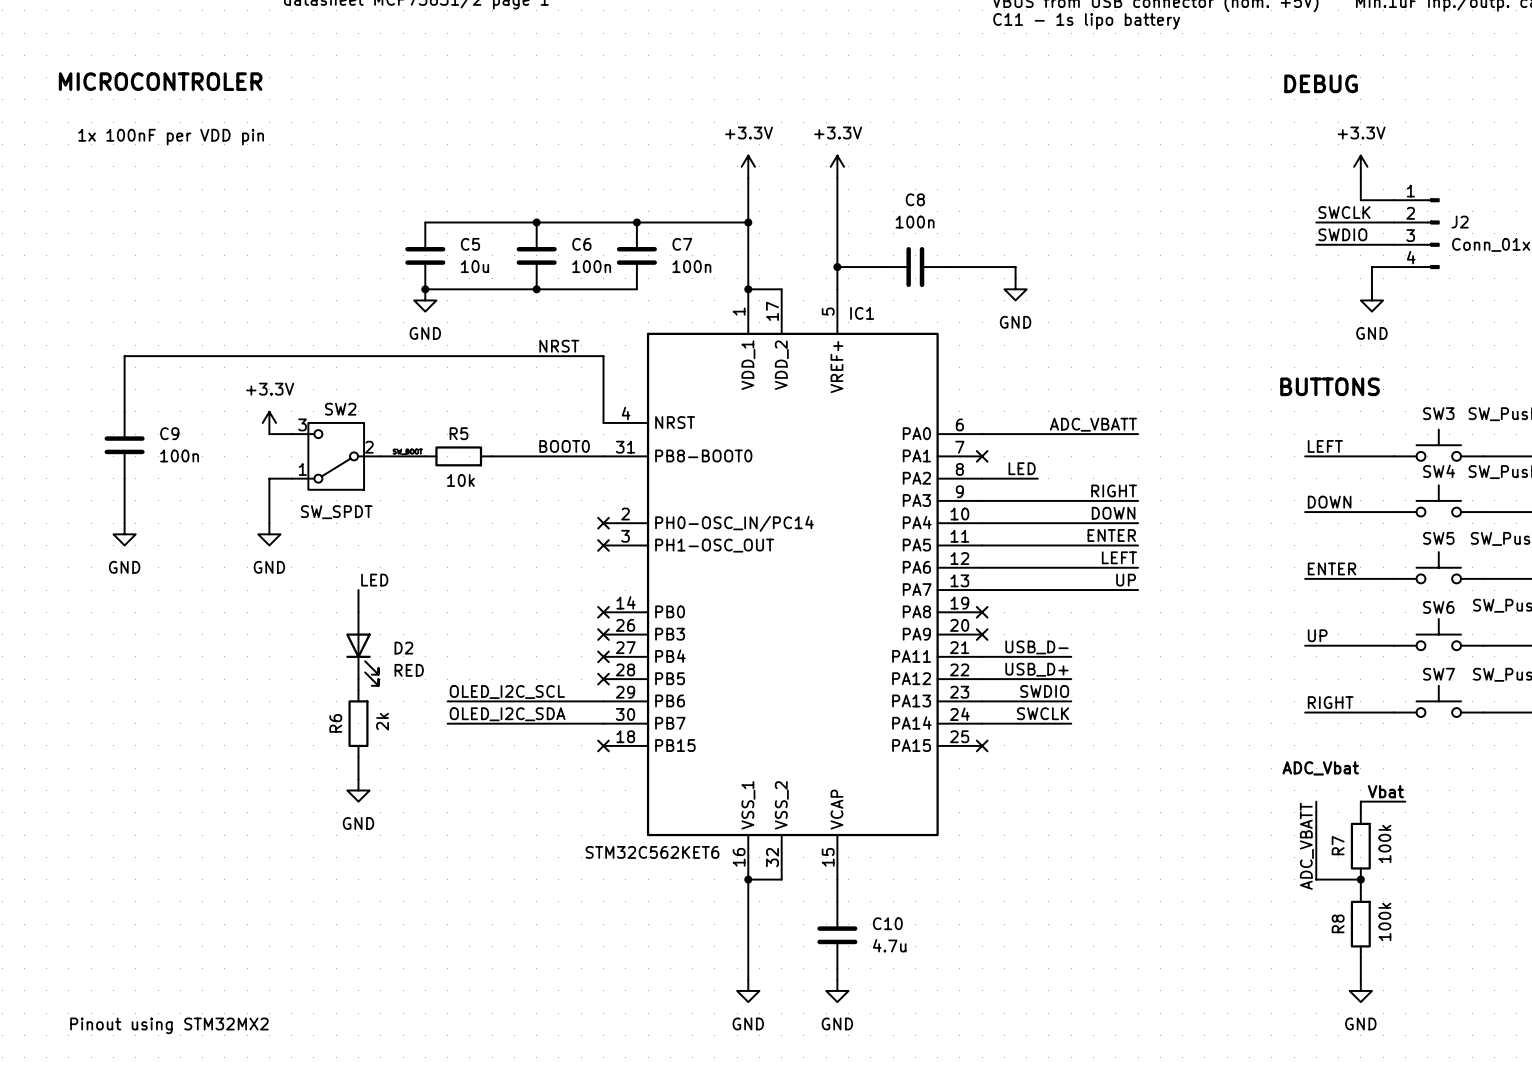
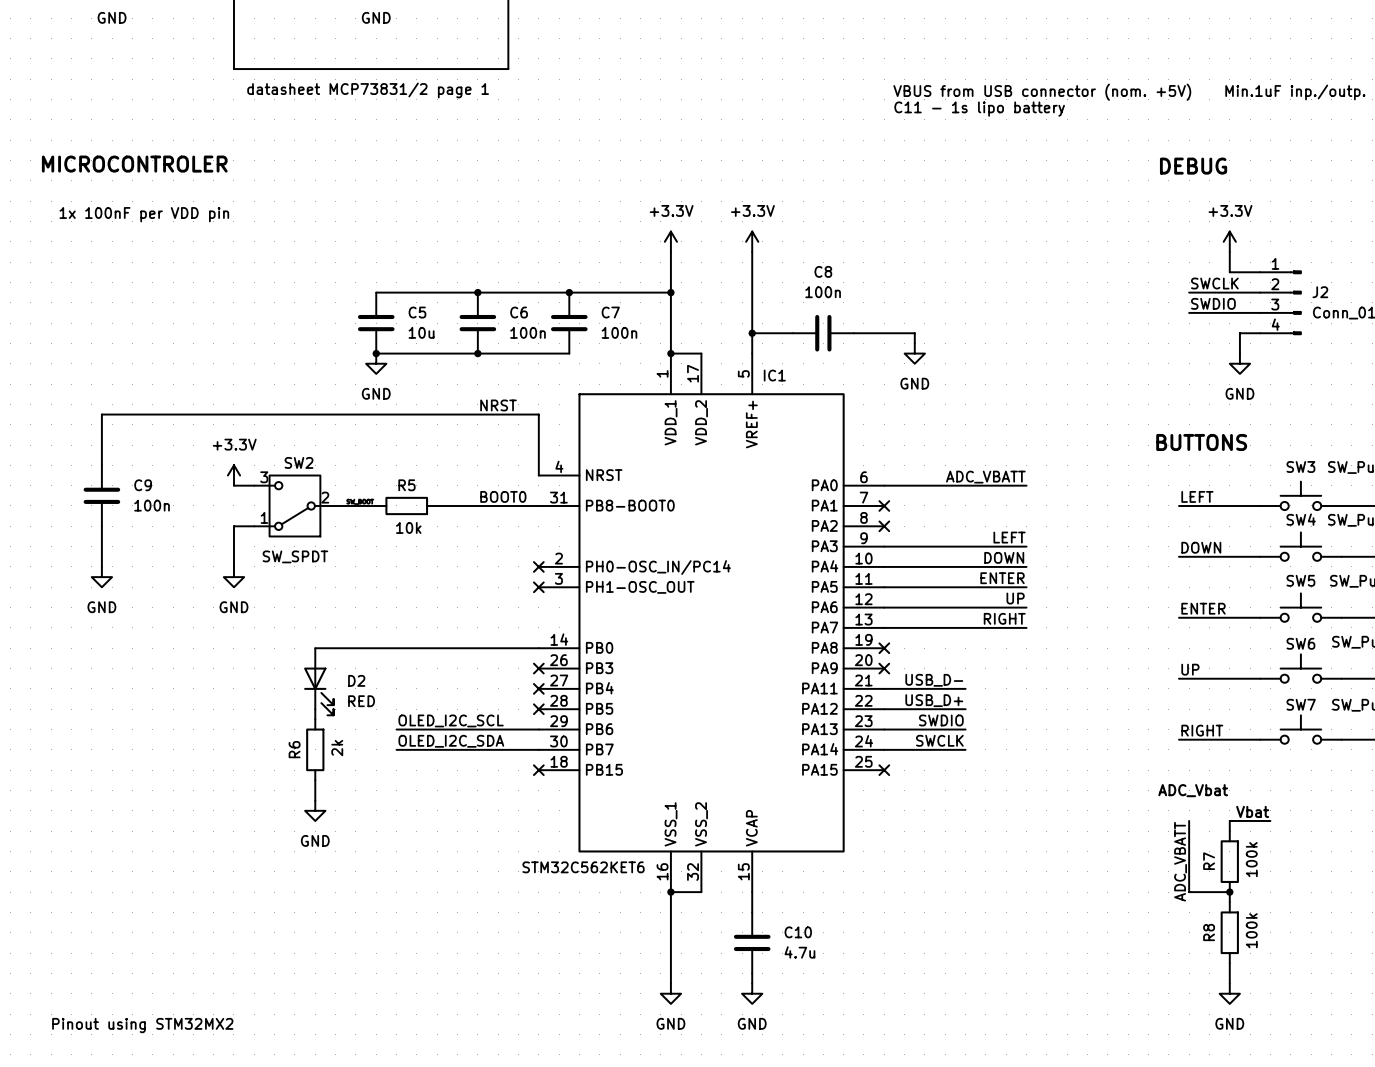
label: LED (1022, 468) -> none
wire: (982, 478) (1037, 478) -> none
no-connect mark: none -> (884, 526)
label: RIGHT (1114, 490) -> LEFT (1009, 537)
label: LEFT (1119, 557) -> UP (1015, 598)
label: LED (374, 580) -> none
label: UP (1126, 580) -> RIGHT (1004, 618)
wire: (358, 590) (358, 612) -> (538, 648) (315, 648)
no-connect mark: (603, 612) -> none

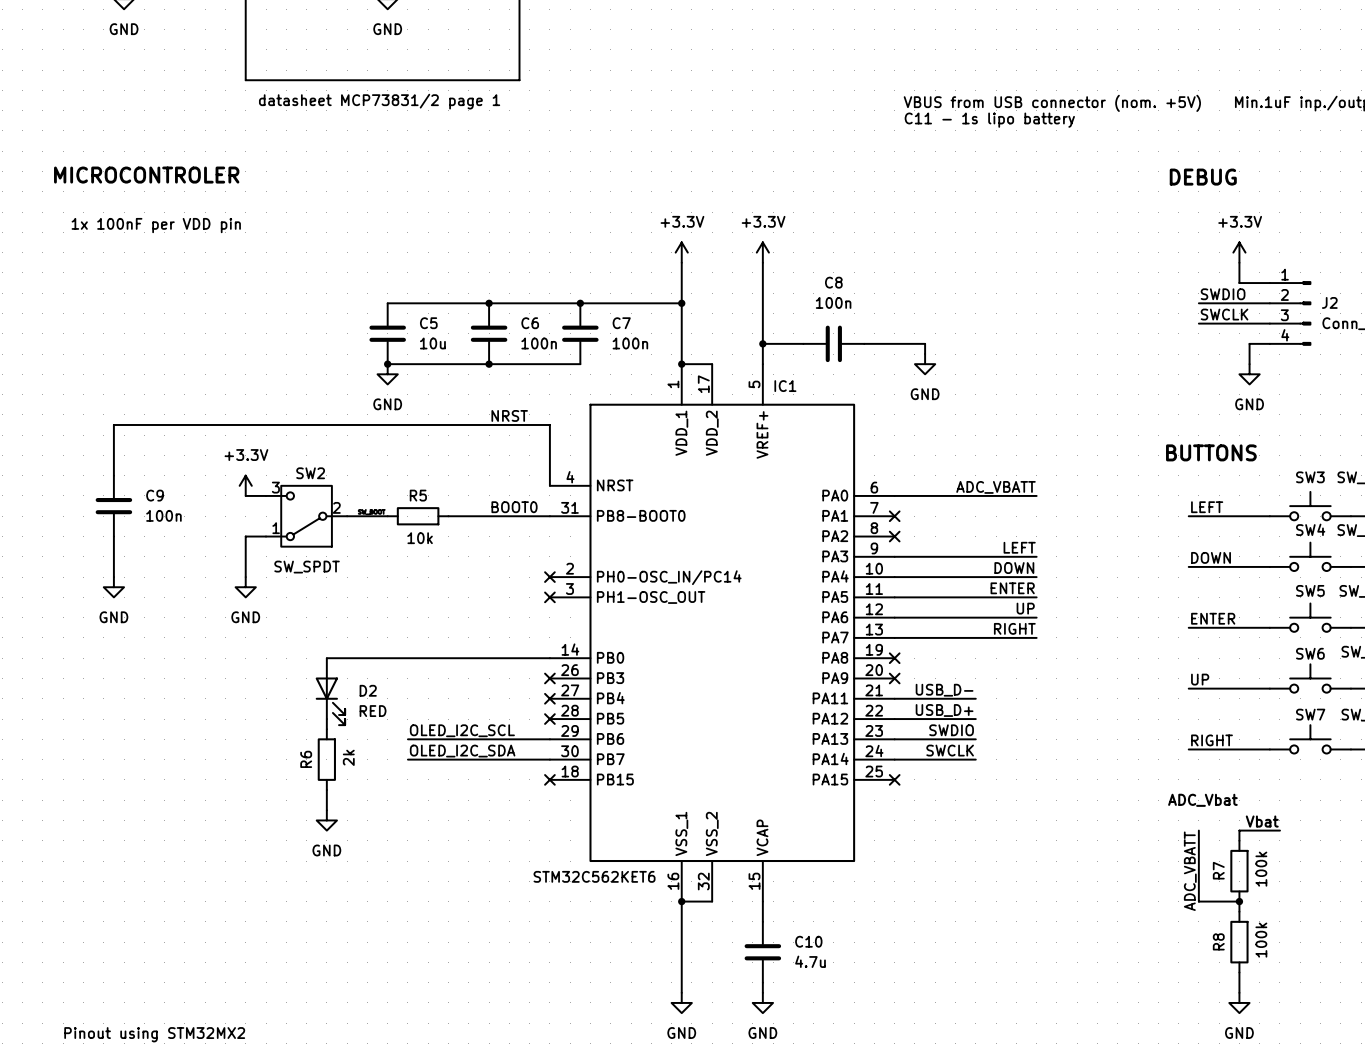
label: SWCLK (1214, 283) -> SWDIO (1223, 294)
label: SWDIO (1213, 303) -> SWCLK (1224, 314)

